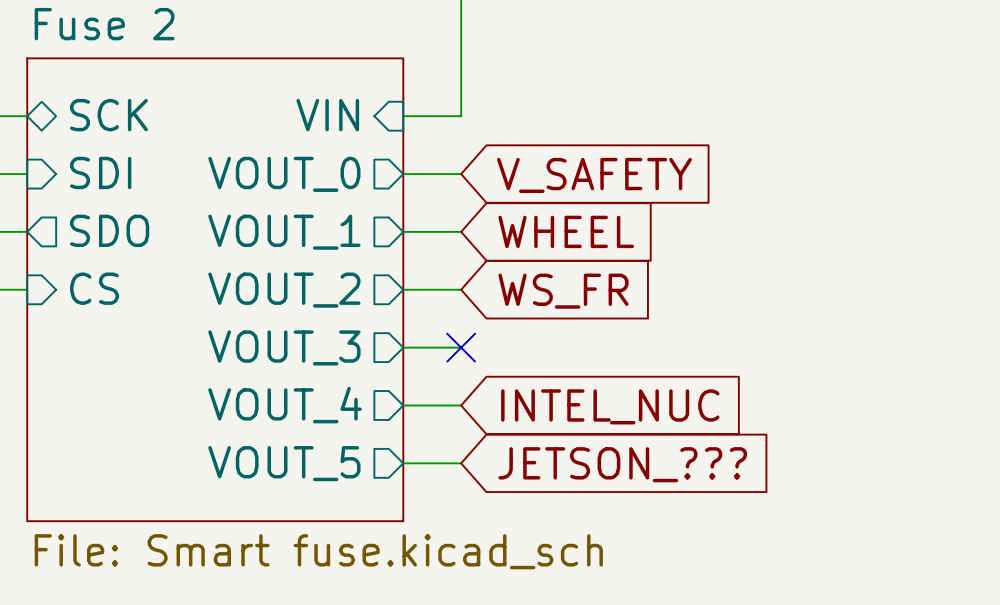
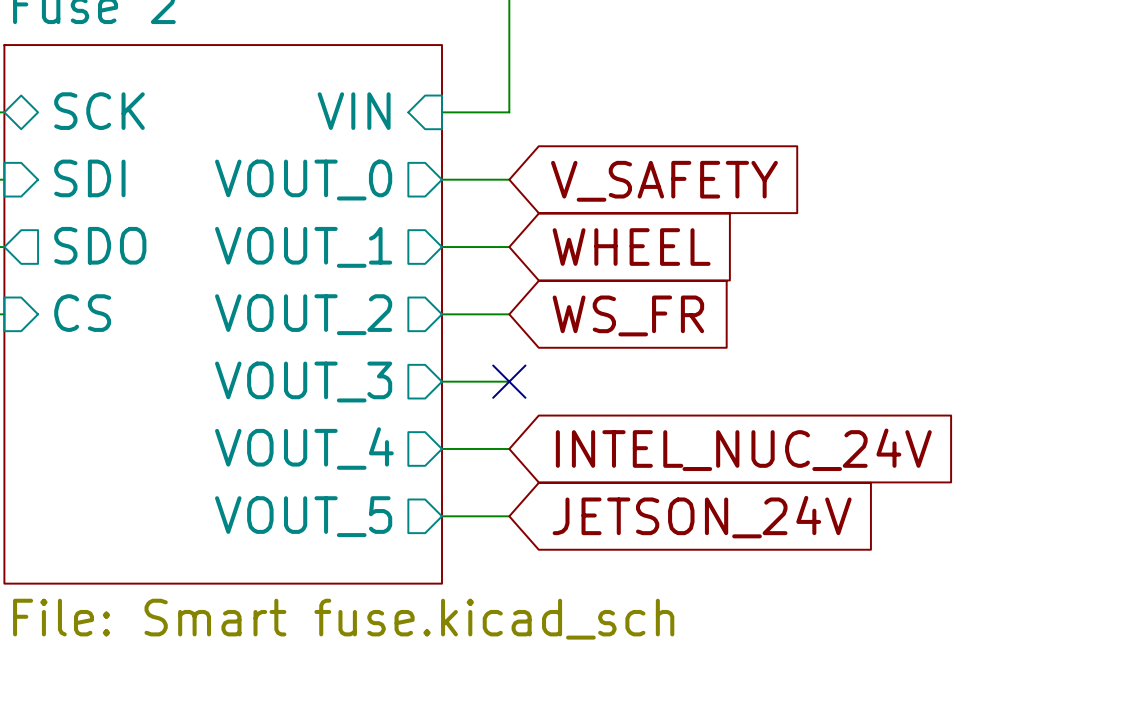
global label: INTEL_NUC (610, 406) -> INTEL_NUC_24V (743, 449)
global label: JETSON_??? (622, 464) -> JETSON_24V (702, 517)

